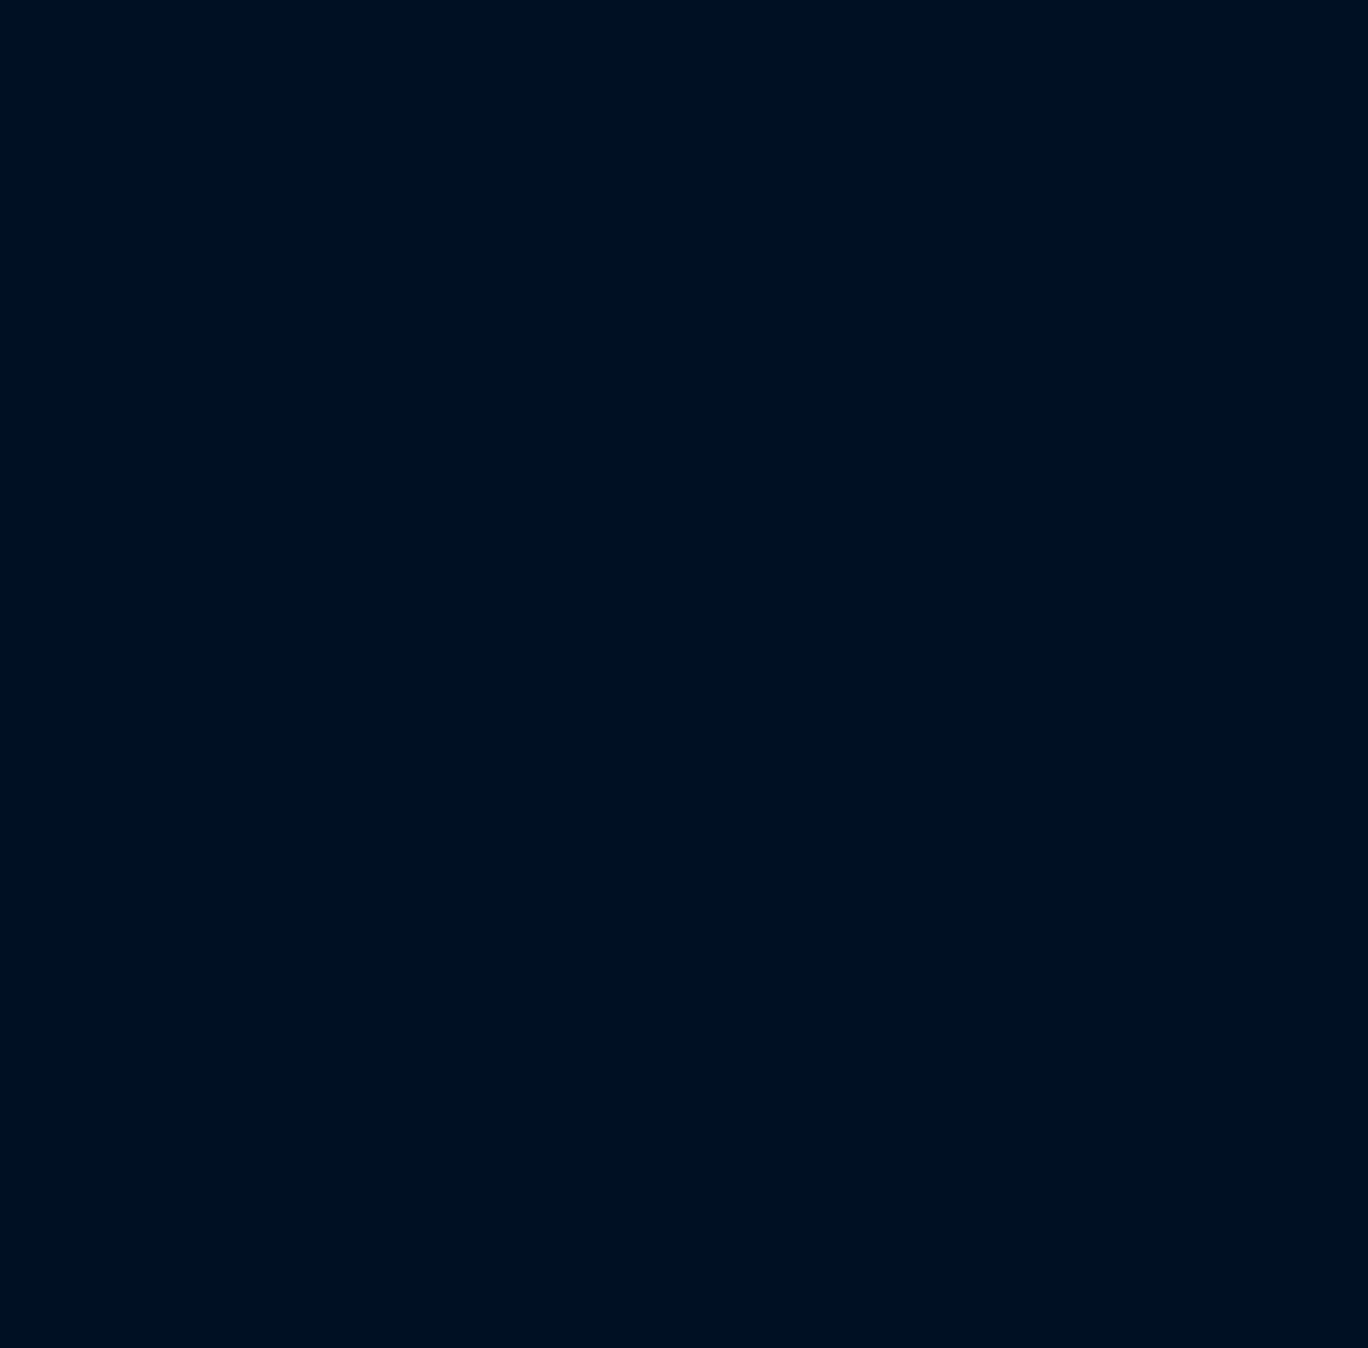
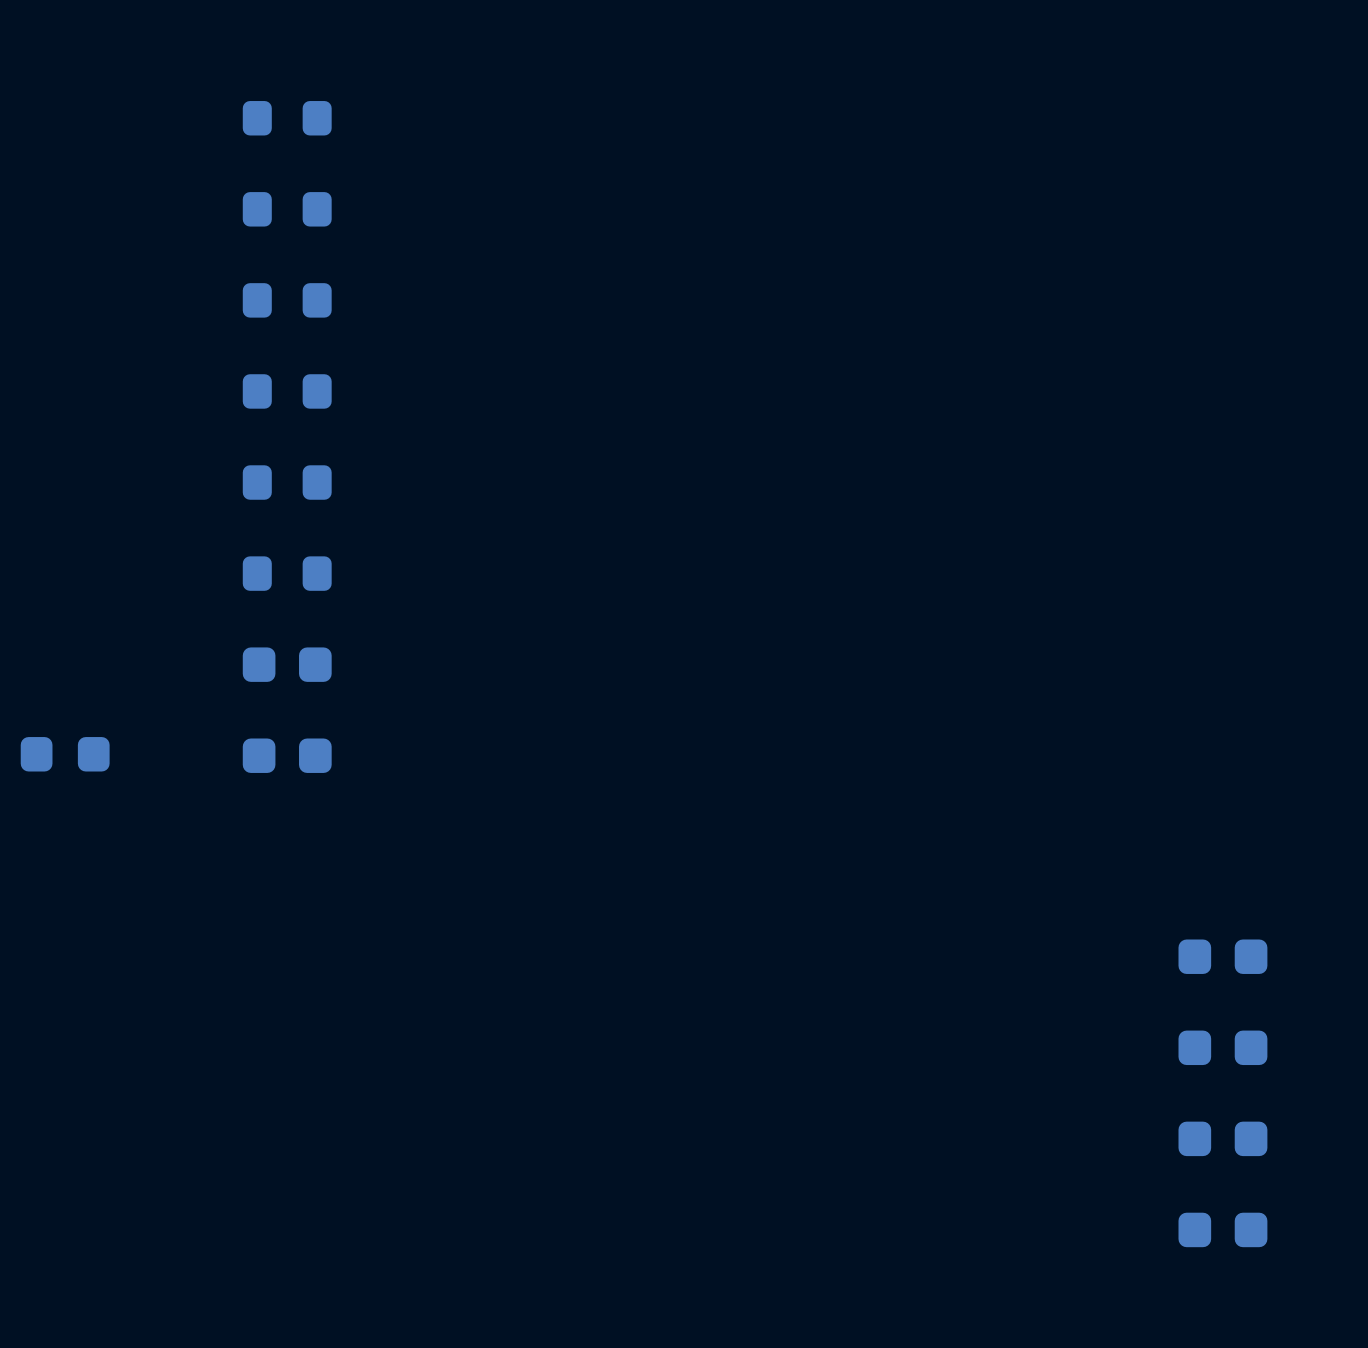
part: none -> (287, 118)
part: none -> (287, 209)
part: none -> (287, 300)
part: none -> (287, 391)
part: none -> (287, 482)
part: none -> (287, 573)
part: none -> (287, 664)
part: none -> (65, 754)
part: none -> (287, 755)
part: none -> (1222, 956)
part: none -> (1222, 1047)
part: none -> (1222, 1138)
part: none -> (1222, 1229)

